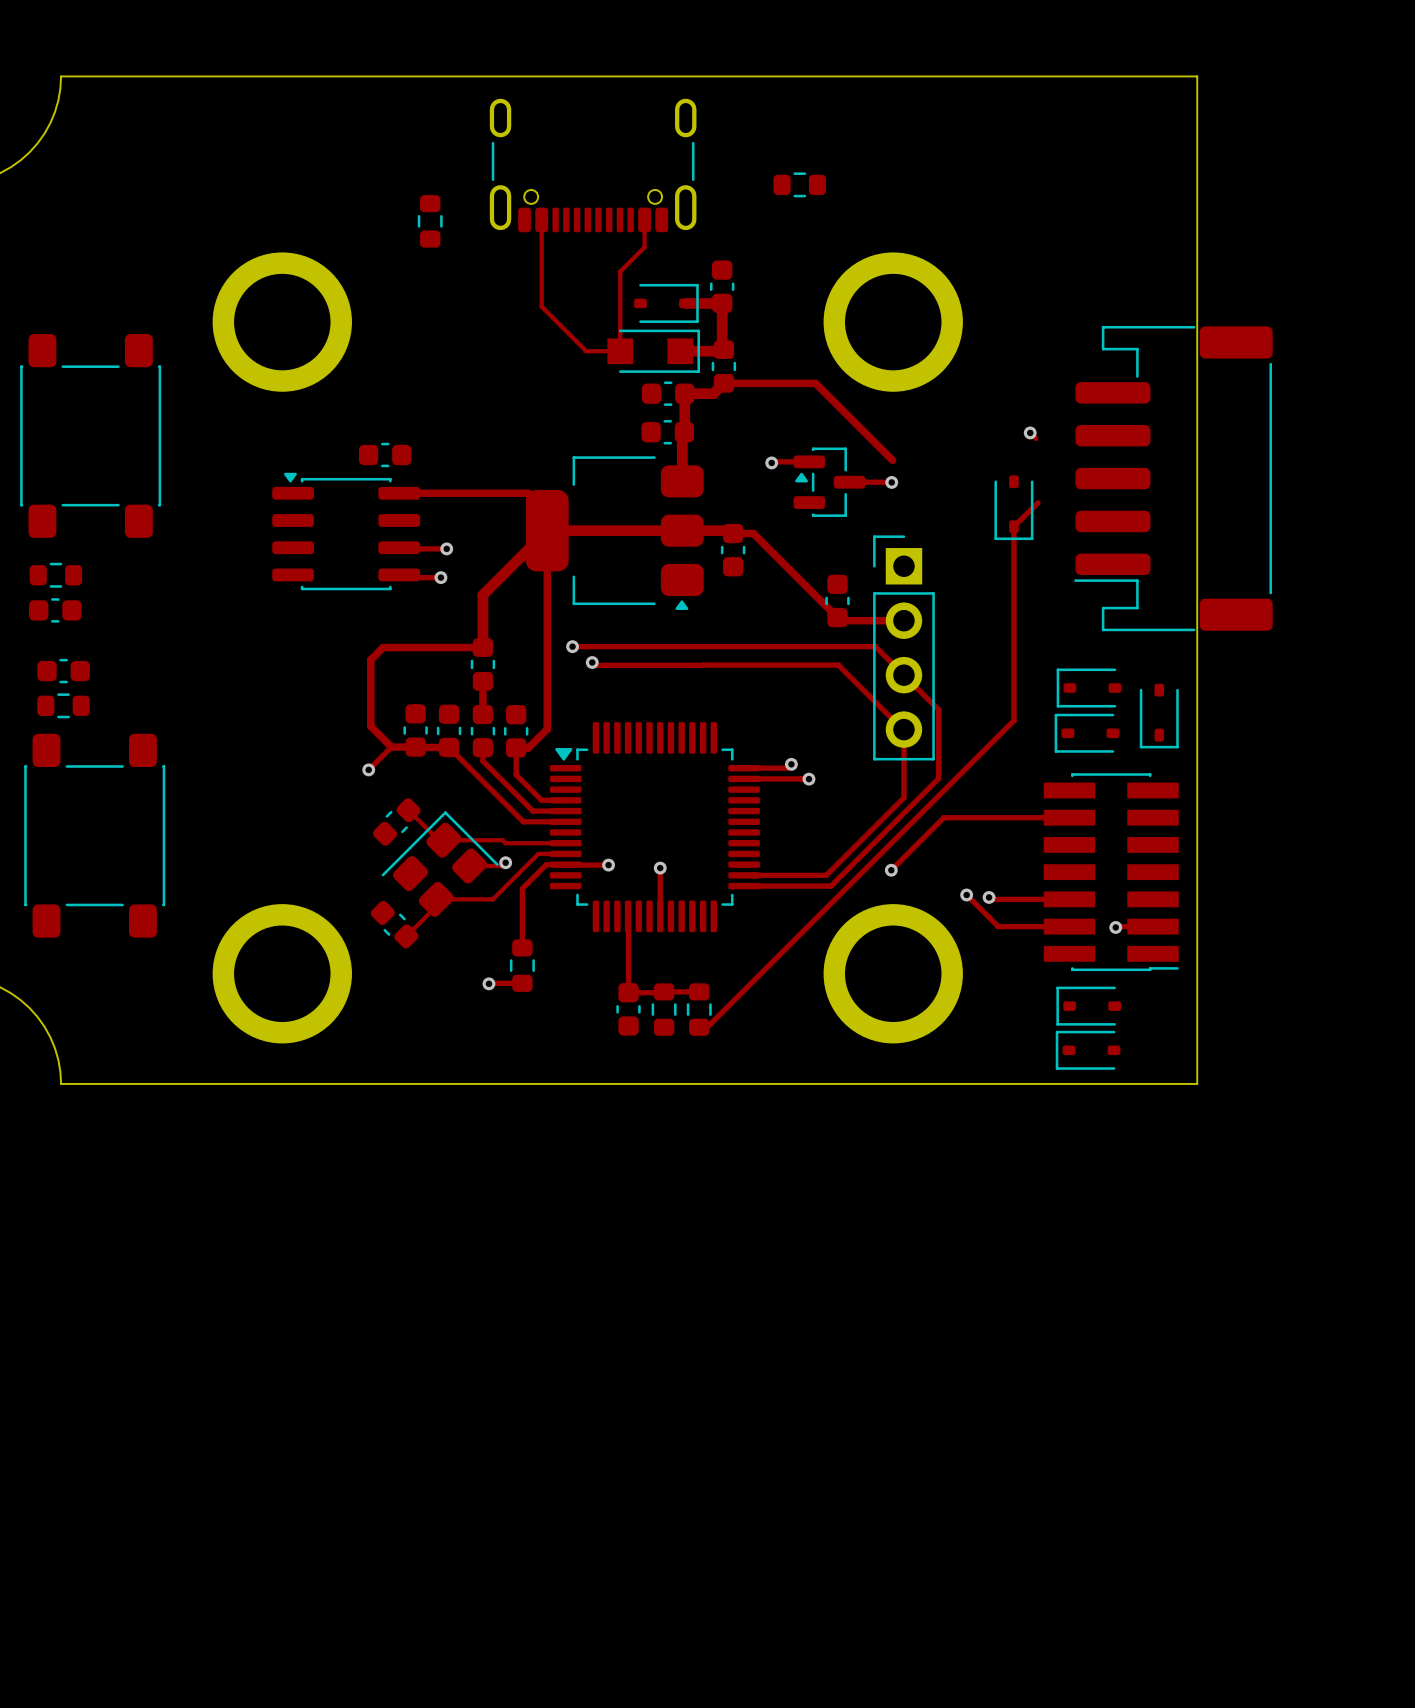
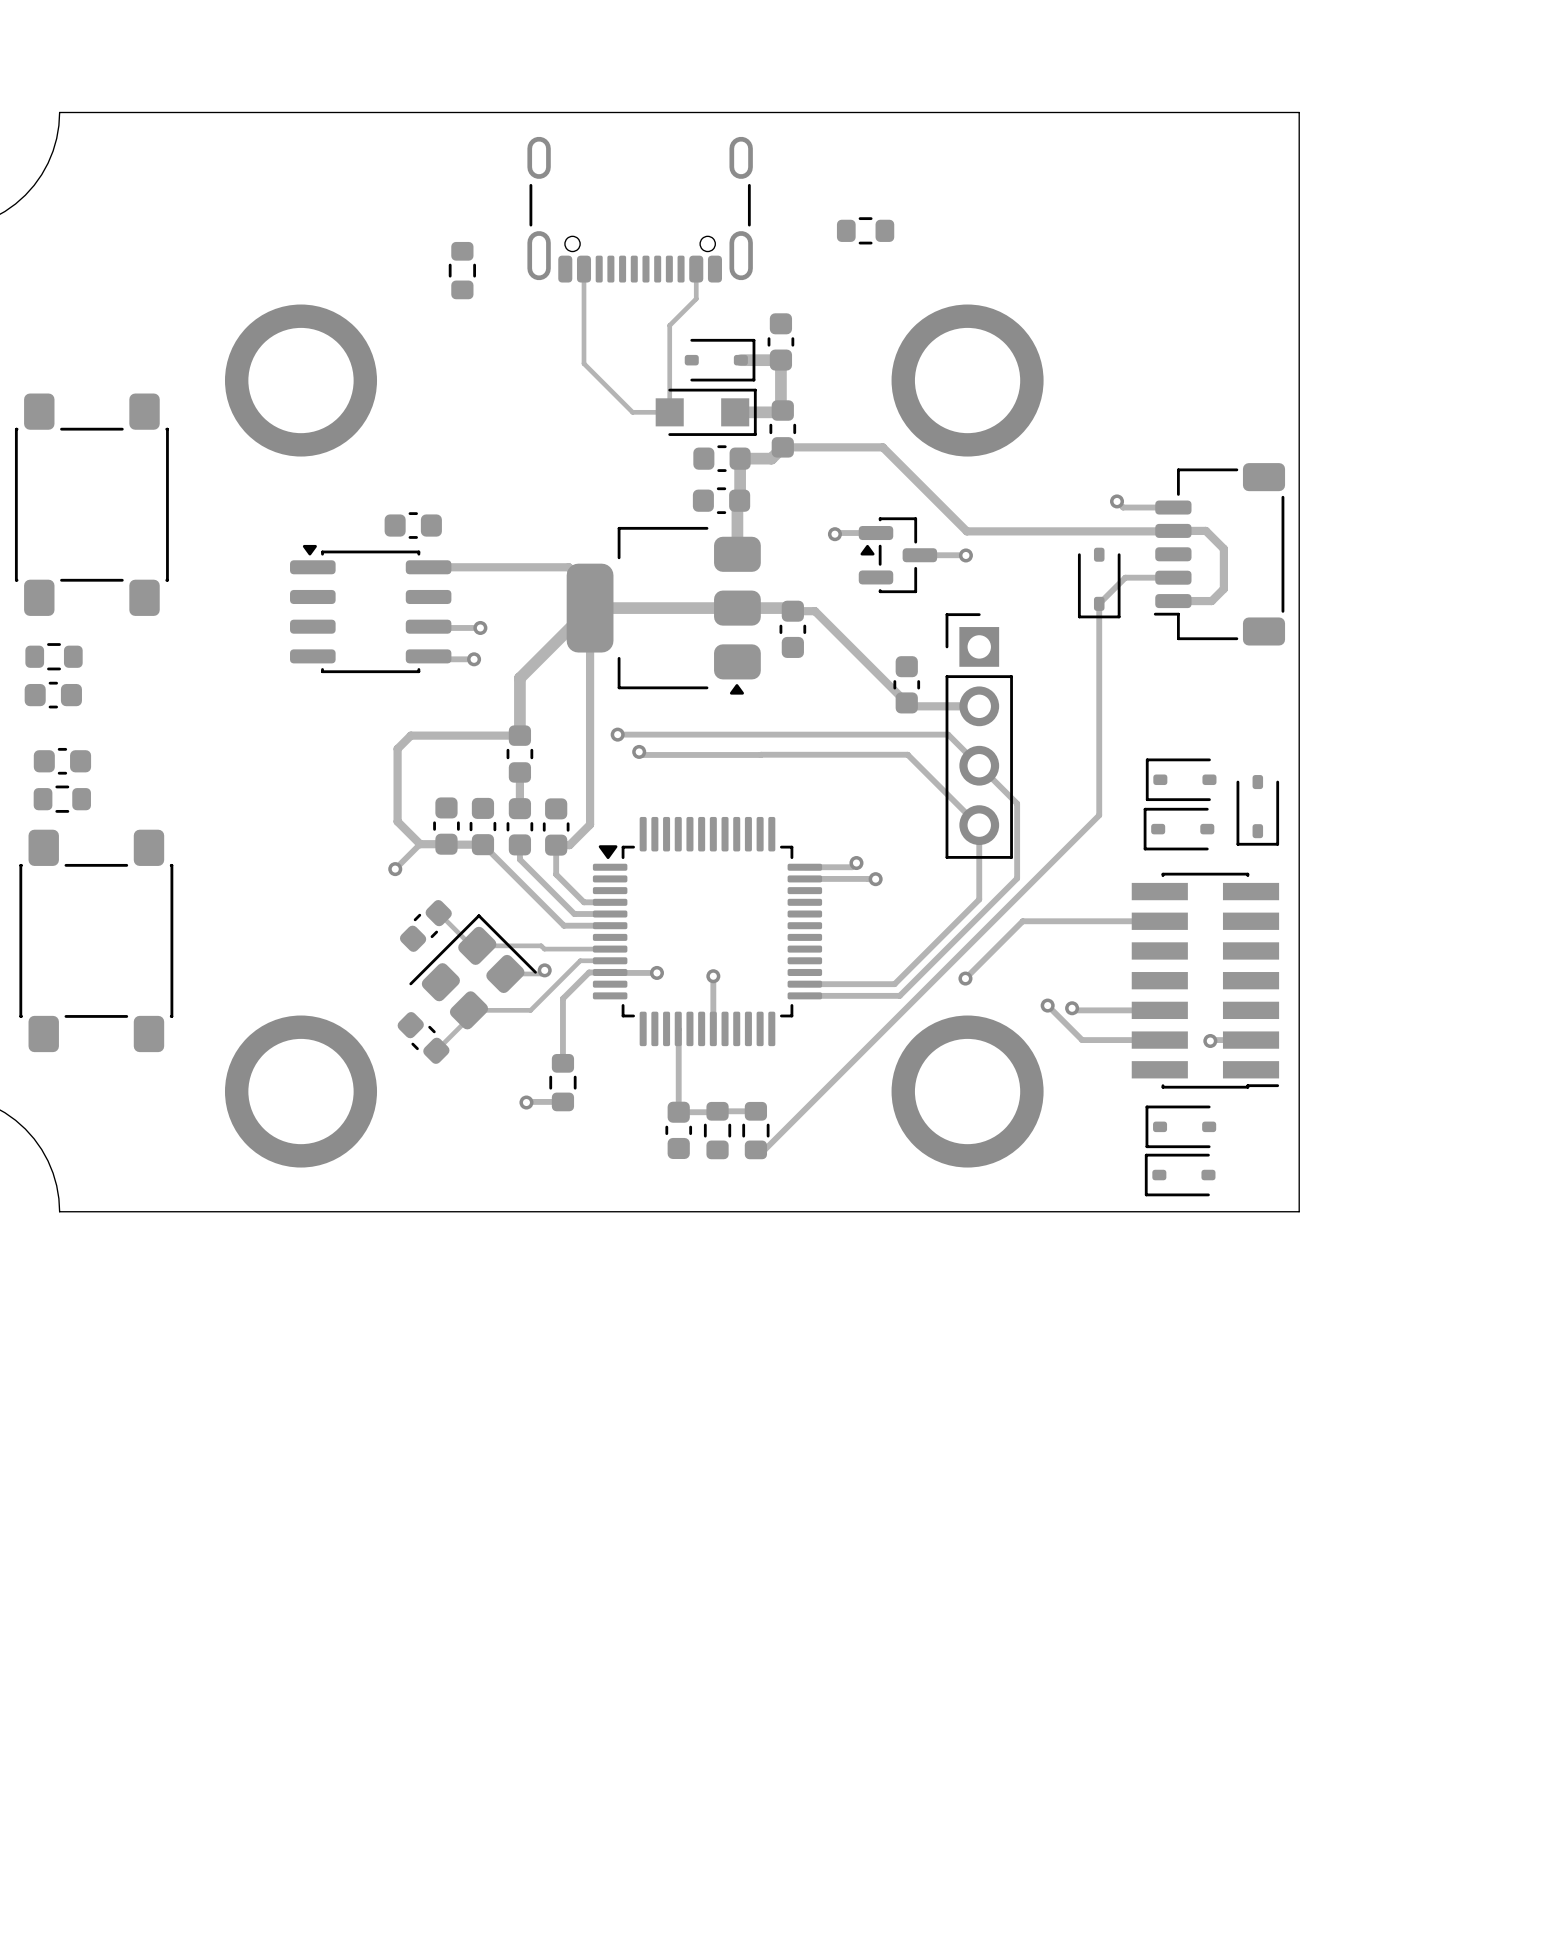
track: none -> (1123, 507) (1173, 507)
track: none -> (966, 531) (1205, 530) (1223, 548) (1223, 588) (1211, 601) (1173, 601)
part: (1173, 478) -> none
part: none -> (1219, 554)
track: none -> (1125, 577) (1173, 577)

